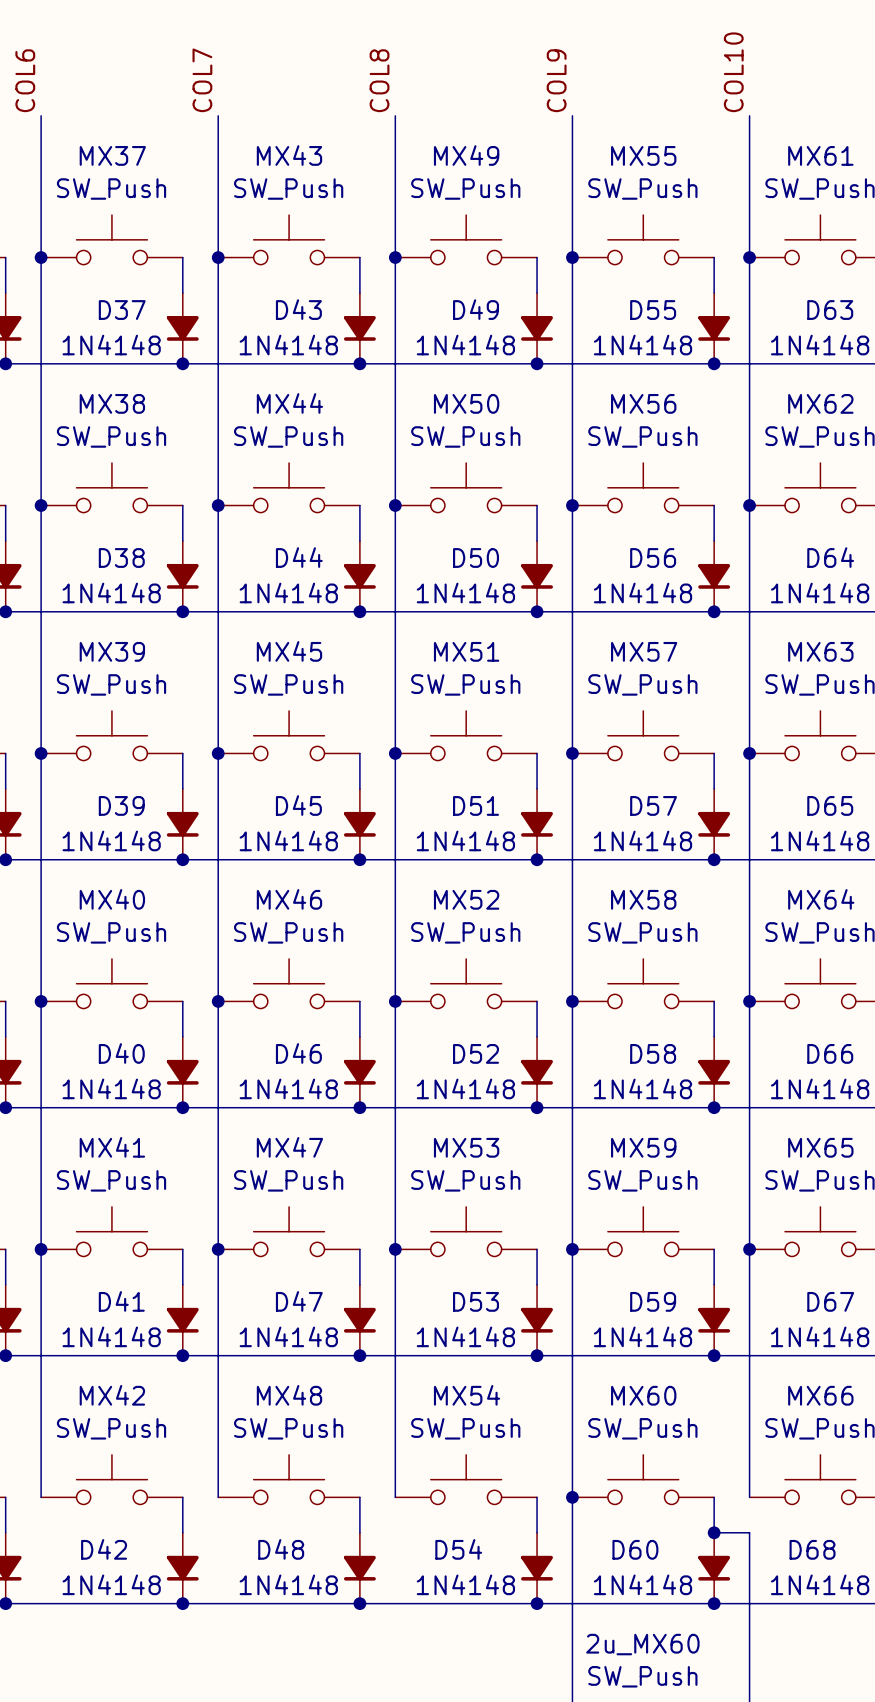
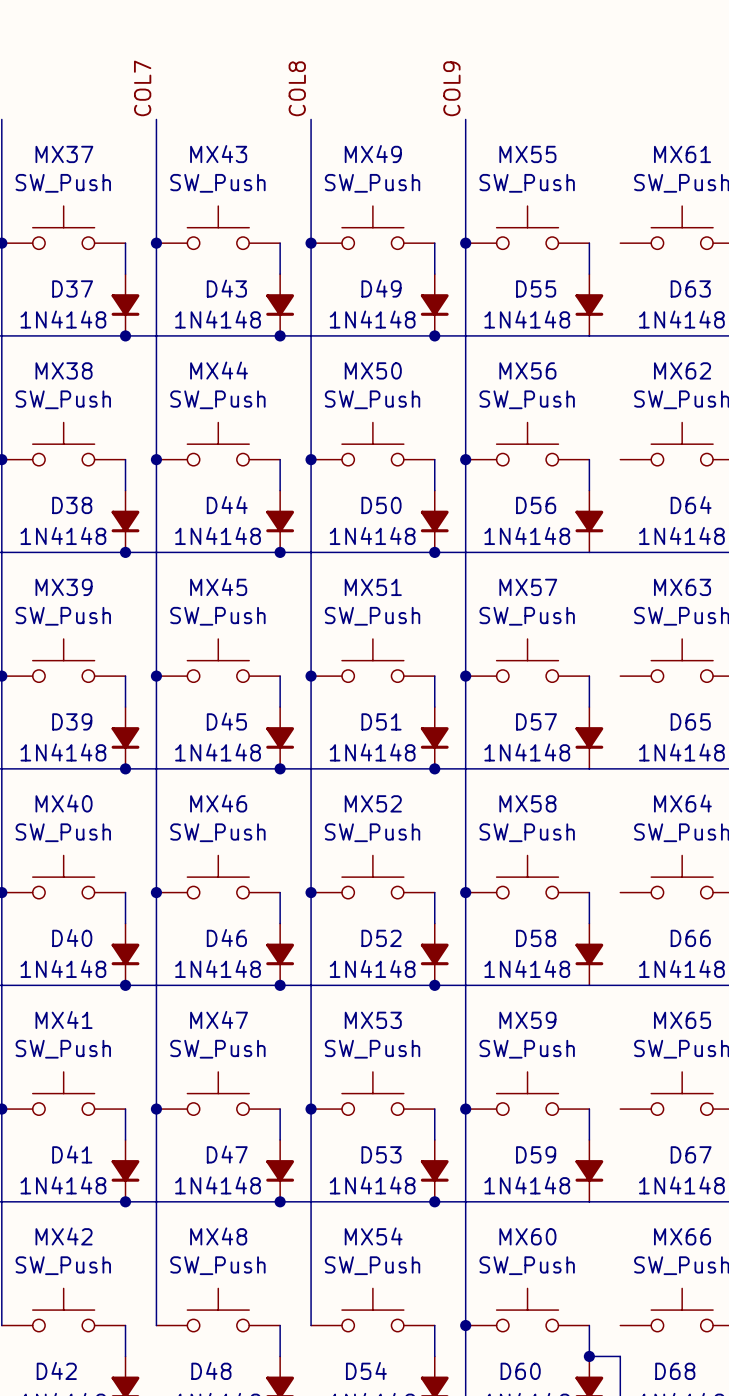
label: COL10 (733, 72) -> none
wire: (749, 115) (749, 1497) -> none
junction: (749, 257) -> none
junction: (714, 363) -> none
junction: (749, 505) -> none
junction: (714, 611) -> none
junction: (749, 753) -> none
junction: (714, 859) -> none
junction: (749, 1001) -> none
junction: (714, 1107) -> none
junction: (749, 1249) -> none
junction: (714, 1355) -> none

